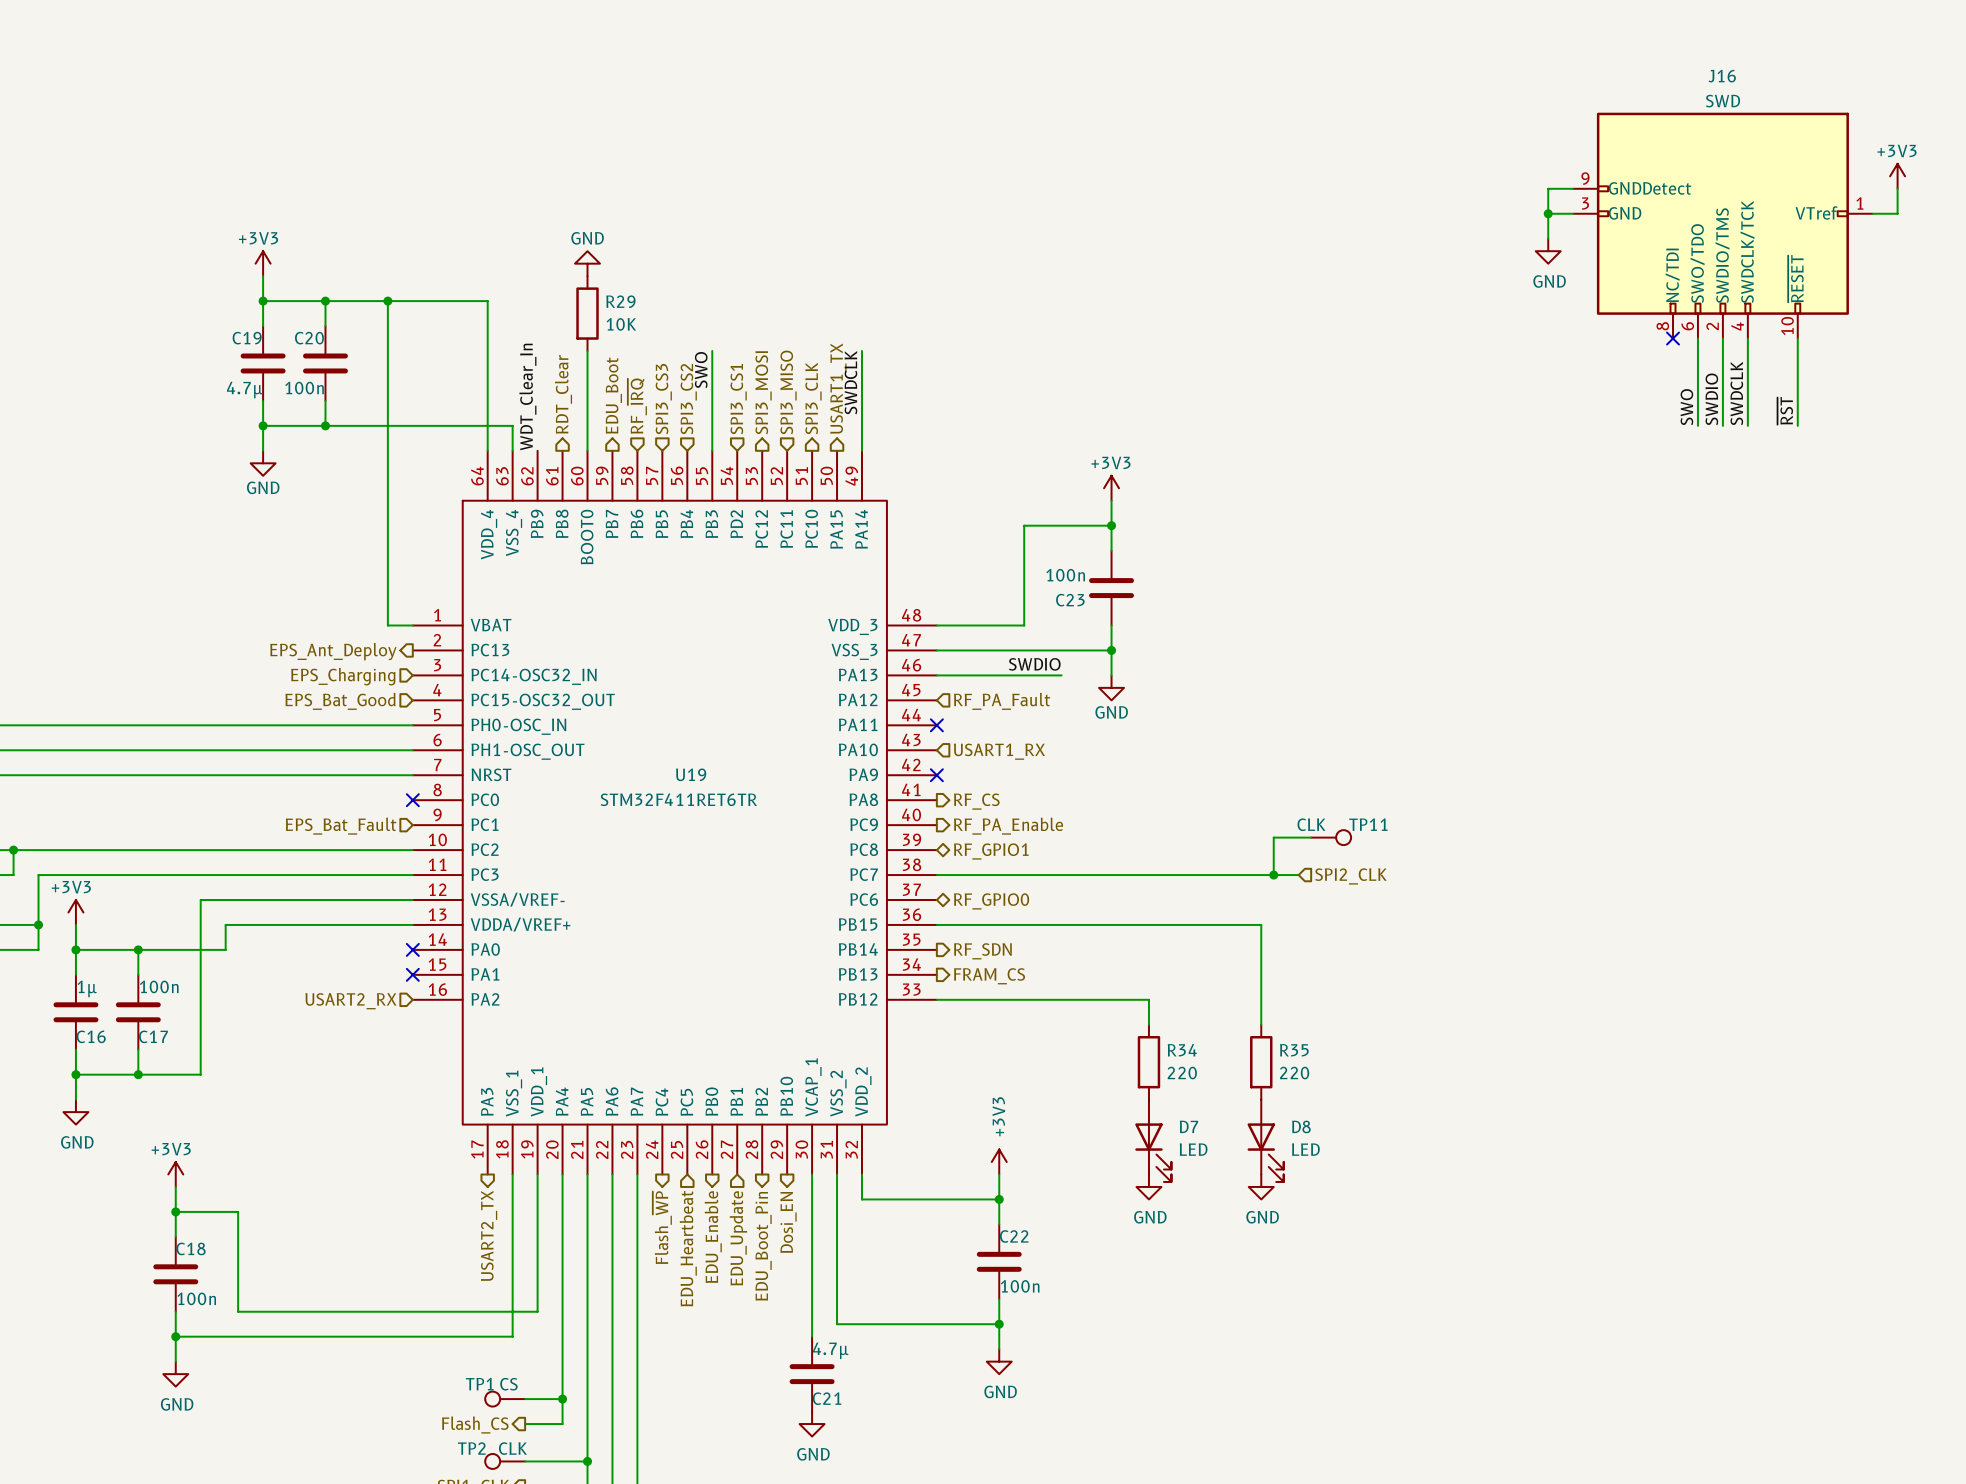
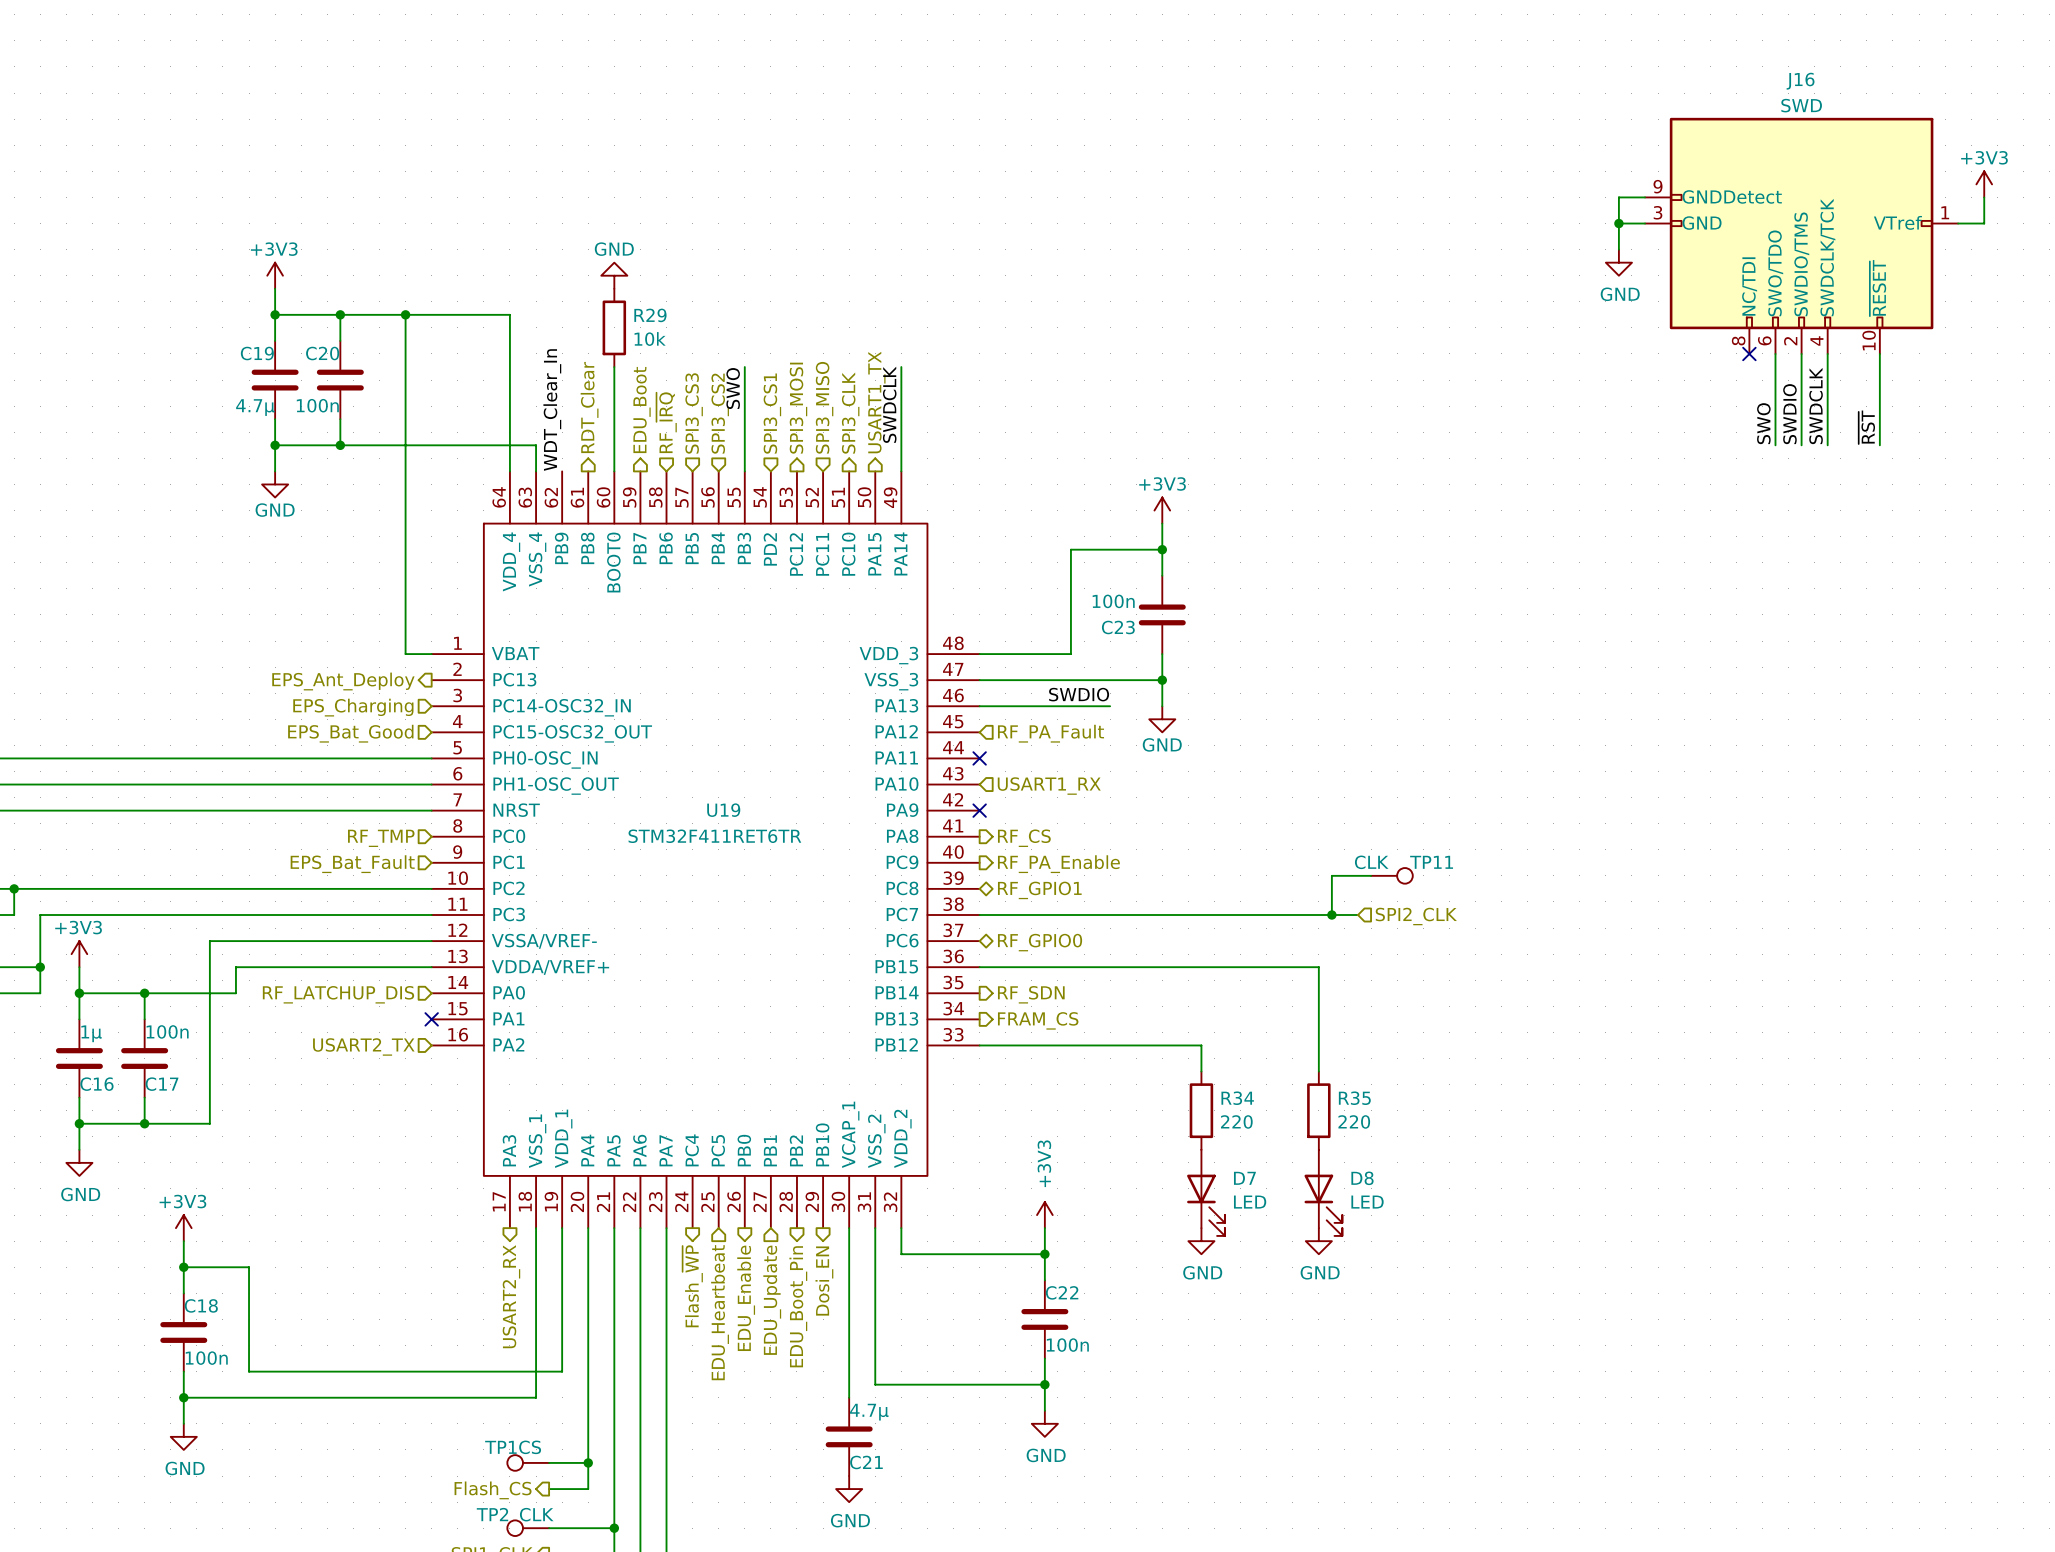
R29 value: 10K (621, 324) -> 10k (650, 339)
no-connect mark: (412, 800) -> none
hierarchical label: none -> RF_TMP (381, 838)
no-connect mark: (412, 949) -> none
hierarchical label: none -> RF_LATCHUP_DIS (338, 994)
hierarchical label: USART2_RX (350, 1001) -> USART2_TX (363, 1046)
hierarchical label: USART2_TX (489, 1235) -> USART2_RX (511, 1296)

